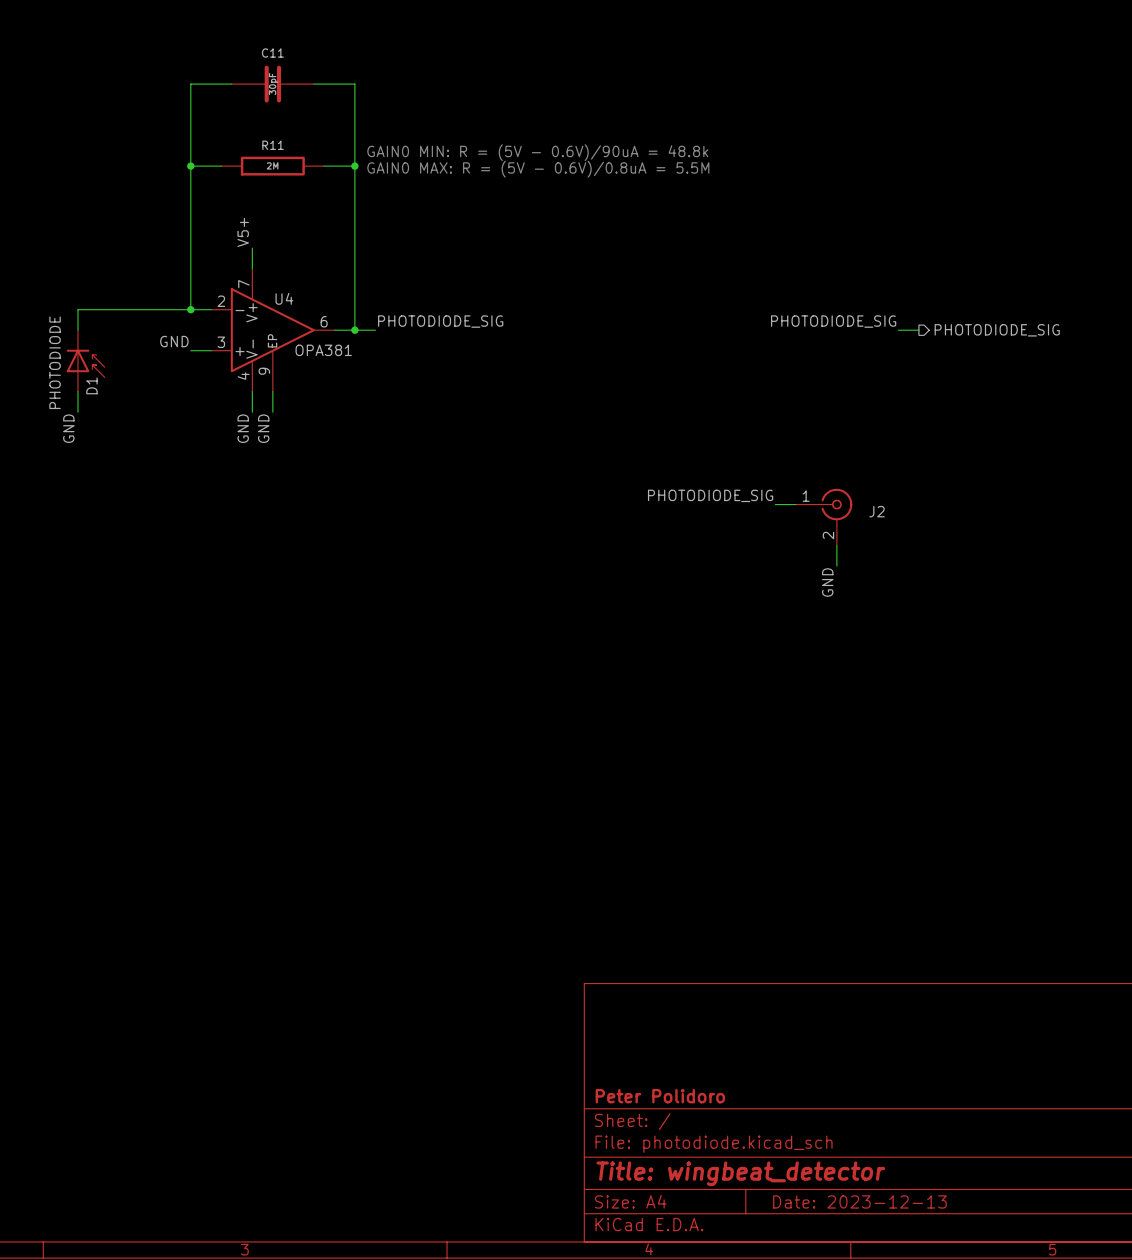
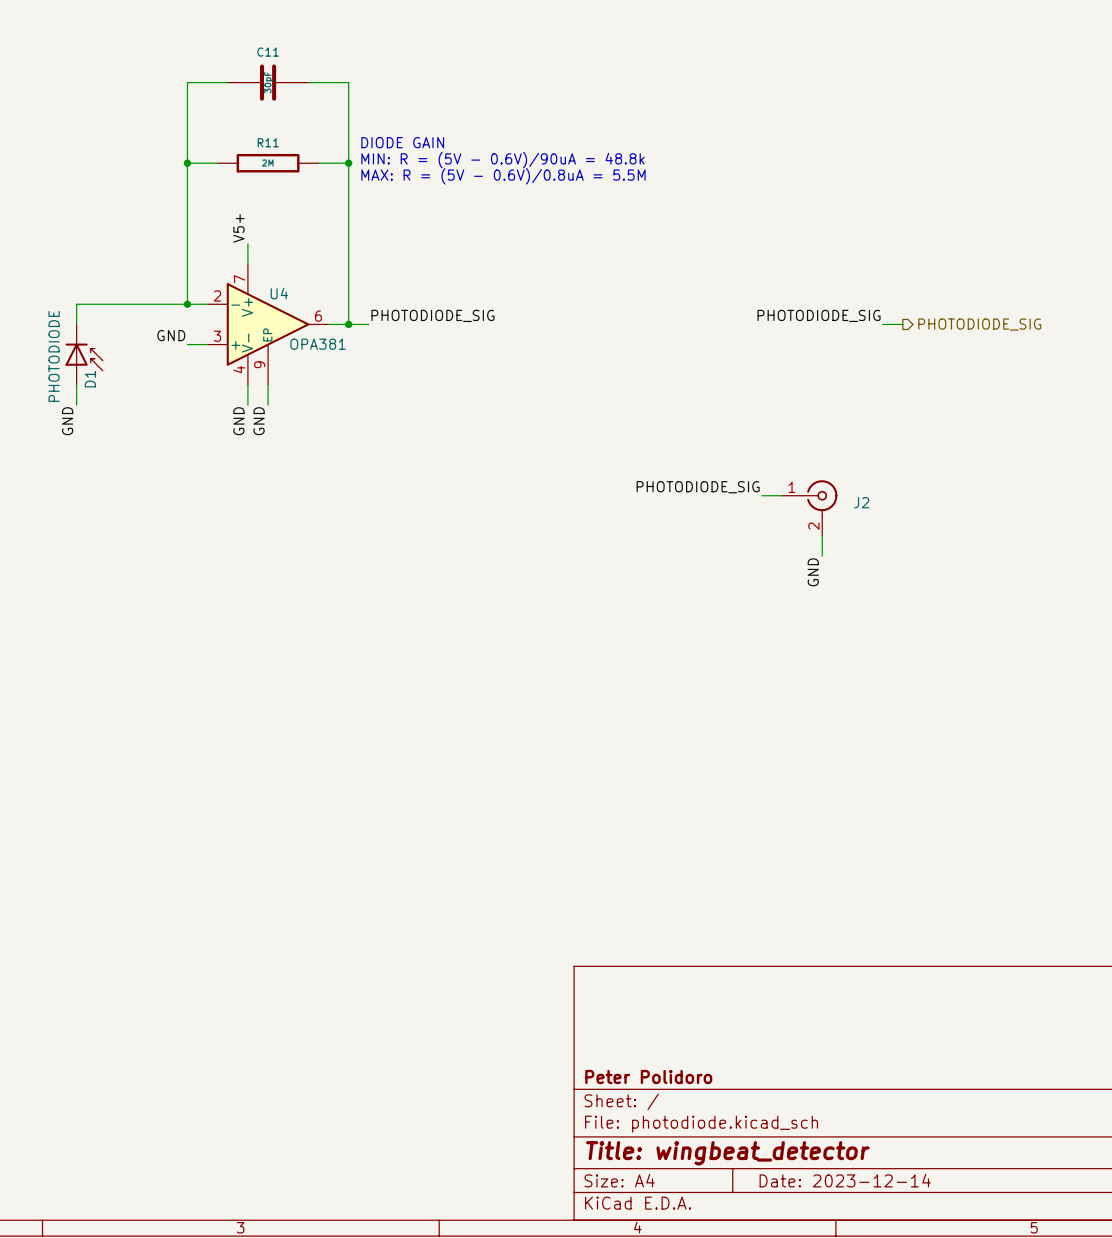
text: none -> DIODE GAIN (402, 142)
text: GAIN0 MIN: R = (5V - 0.6V)/90uA = 48.8k (537, 152) -> none
text: none -> MIN: R = (5V - 0.6V)/90uA = 48.8k (503, 160)
text: GAIN0 MAX: R = (5V - 0.6V)/0.8uA = 5.5M (538, 169) -> none
text: none -> MAX: R = (5V - 0.6V)/0.8uA = 5.5M (503, 176)
title block: Date: 2023-12-13 (859, 1201) -> Date: 2023-12-14 (845, 1180)

